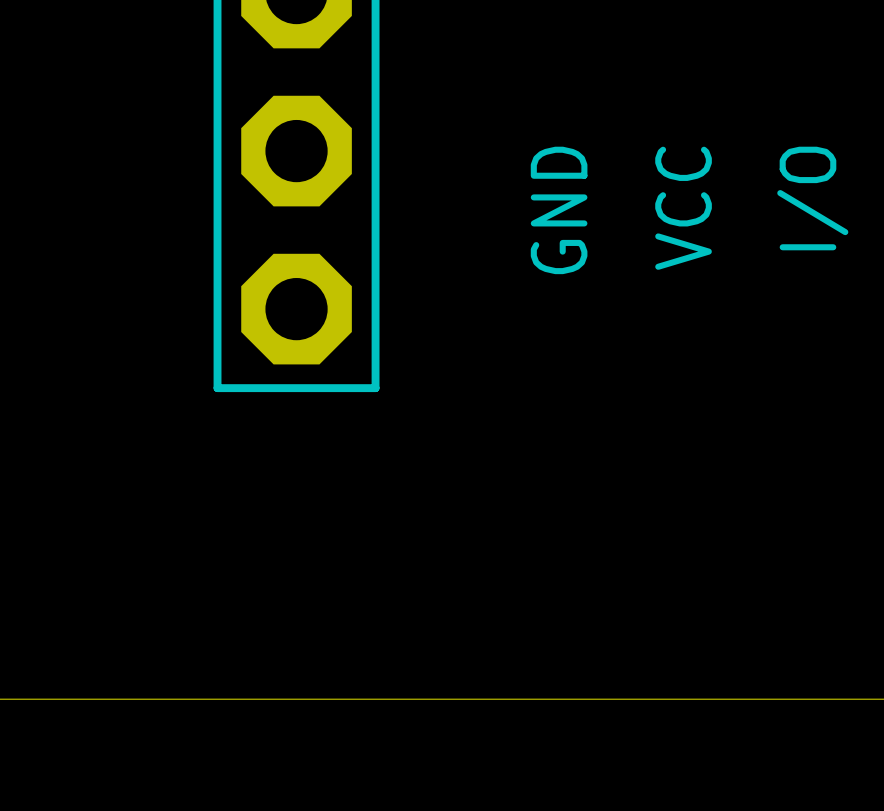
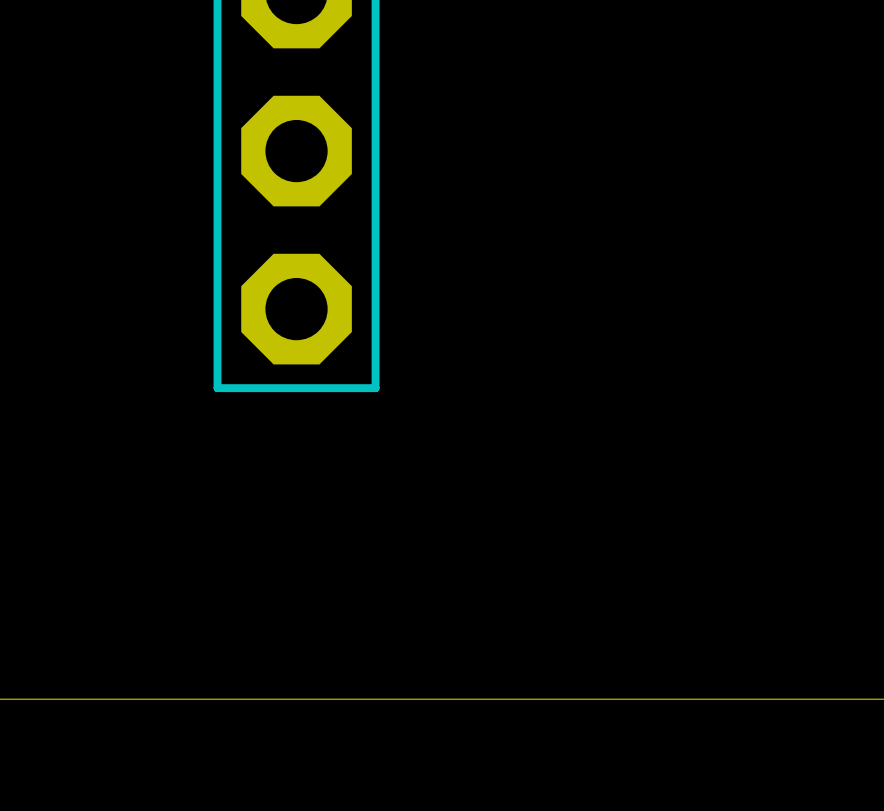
text: I/O (812, 198) -> none
text: VCC (683, 208) -> none
text: GND (559, 210) -> none

